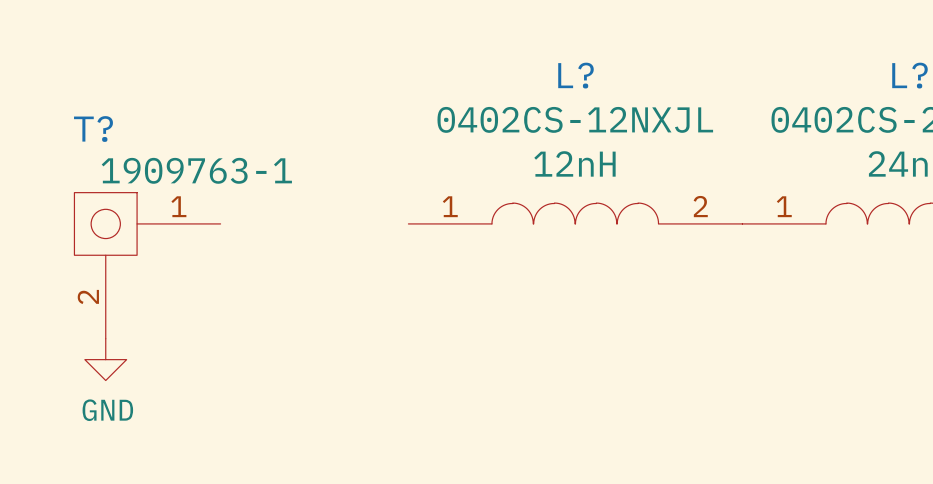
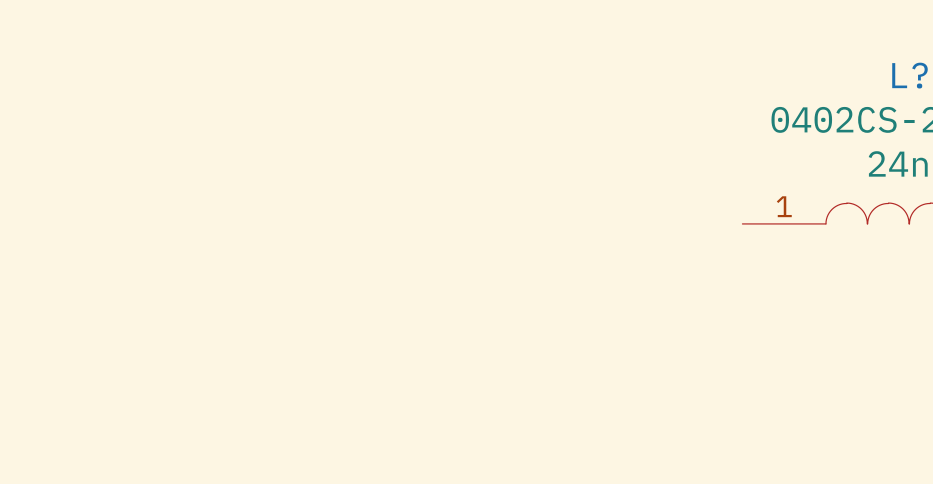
L?: 0402CS-12NXJL (575, 213) -> none
T?: 1909763-1 (147, 265) -> none
power symbol: GND (105, 359) -> none

